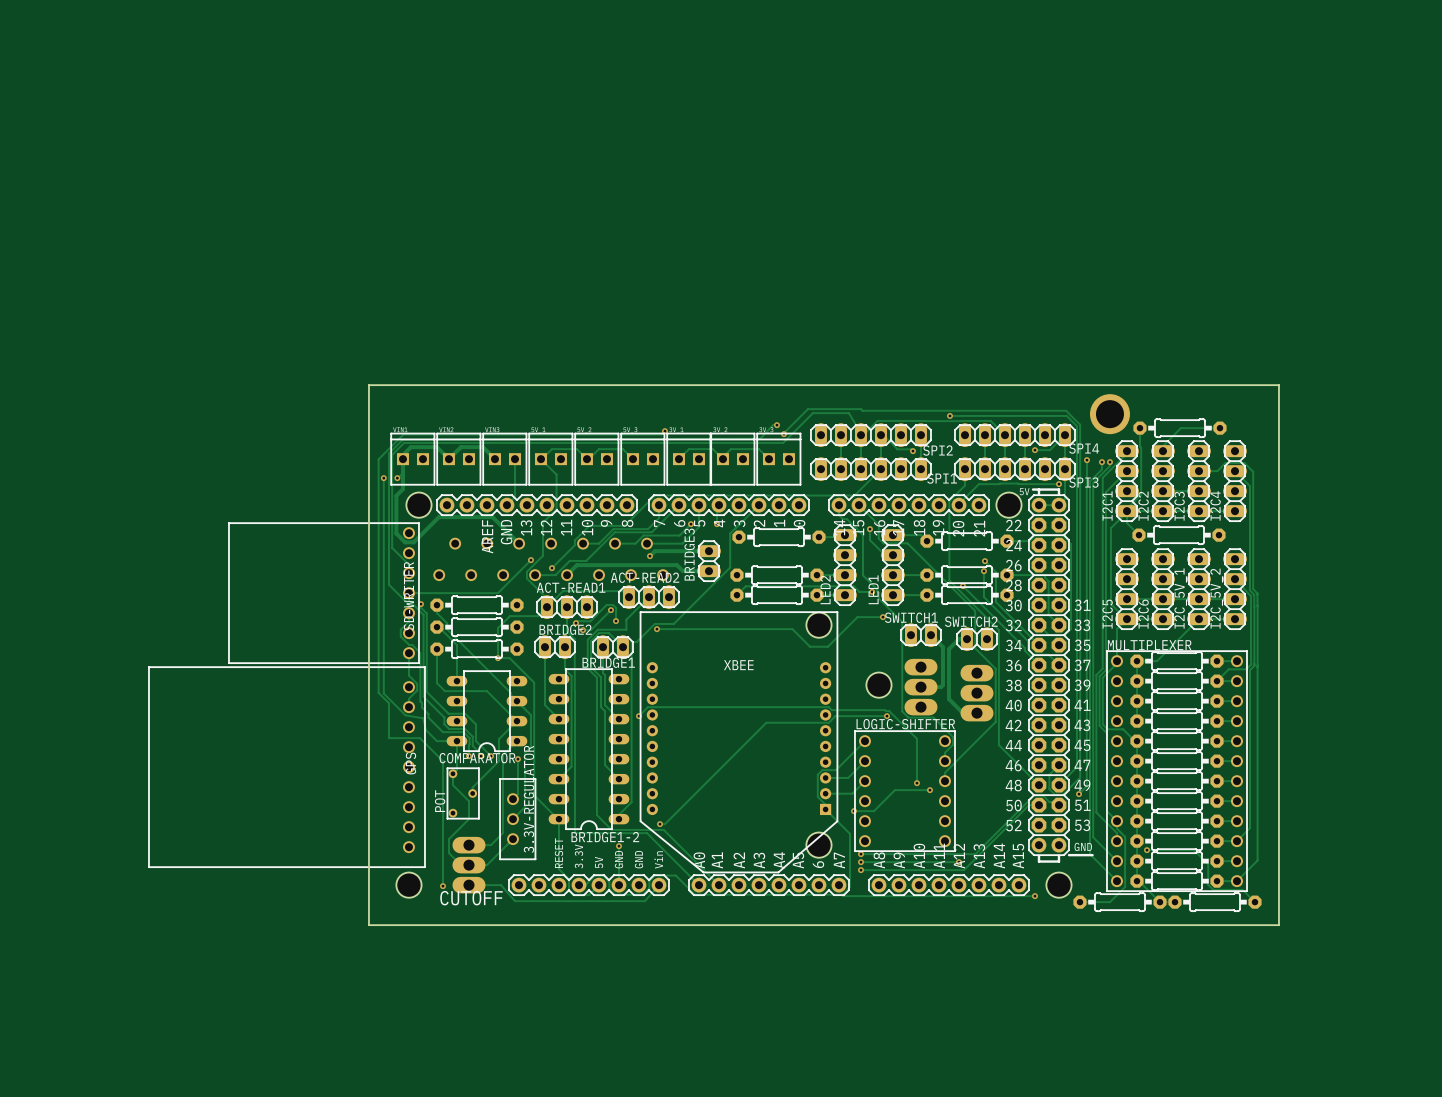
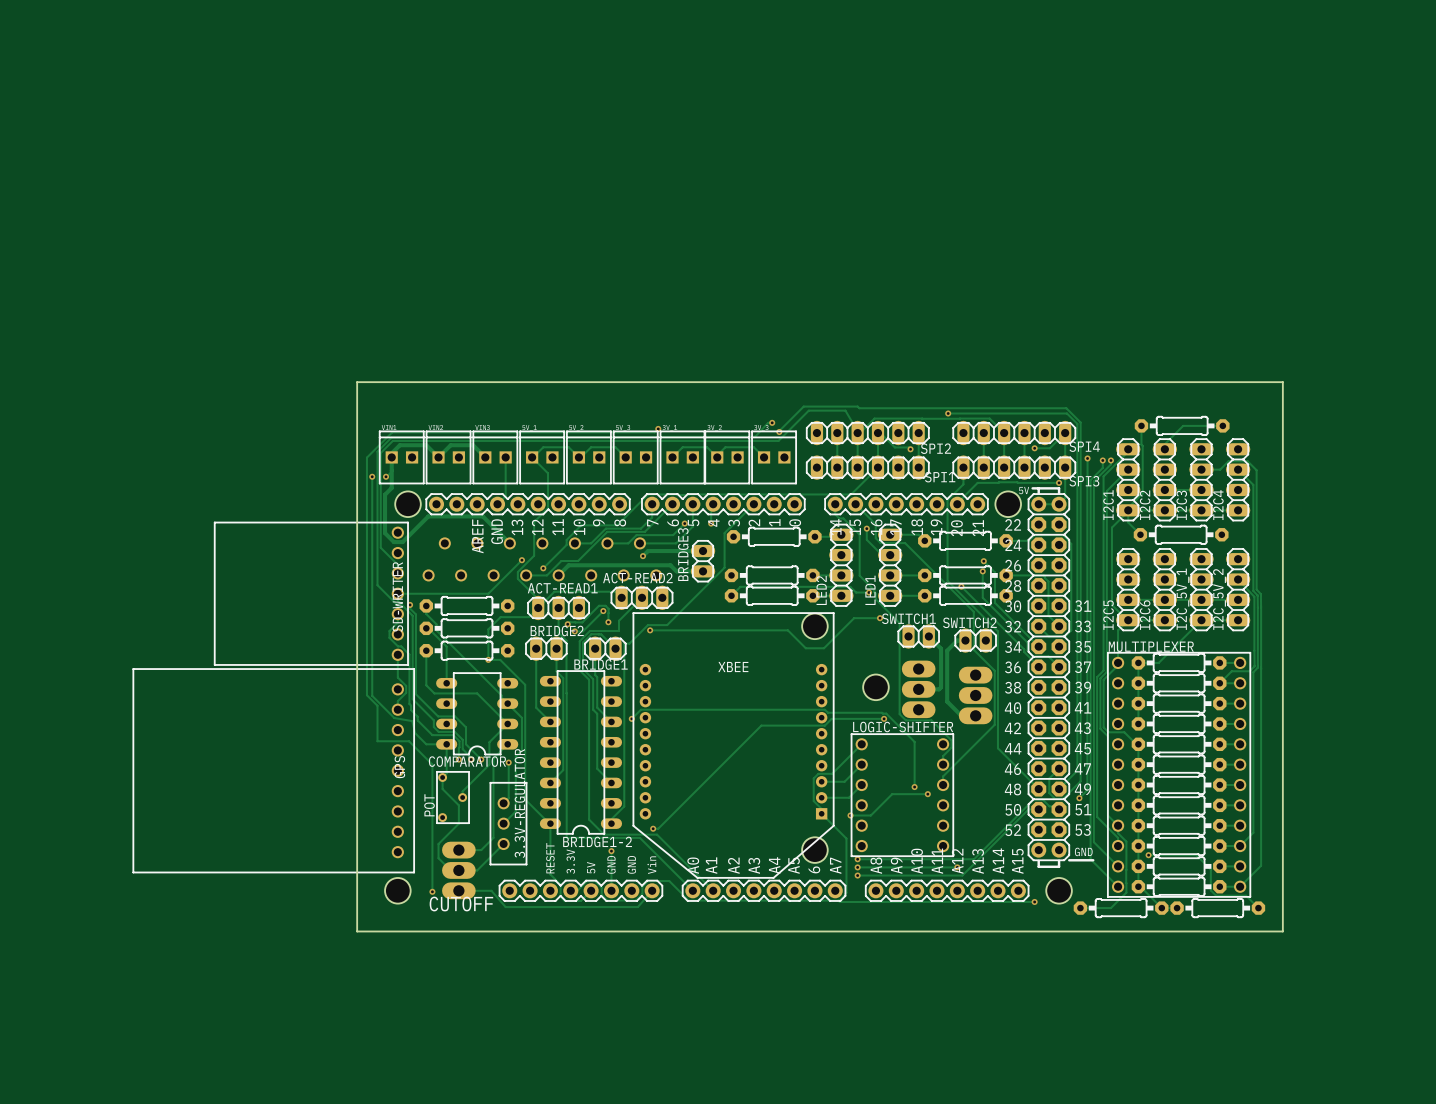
part: (1109, 414) -> none

